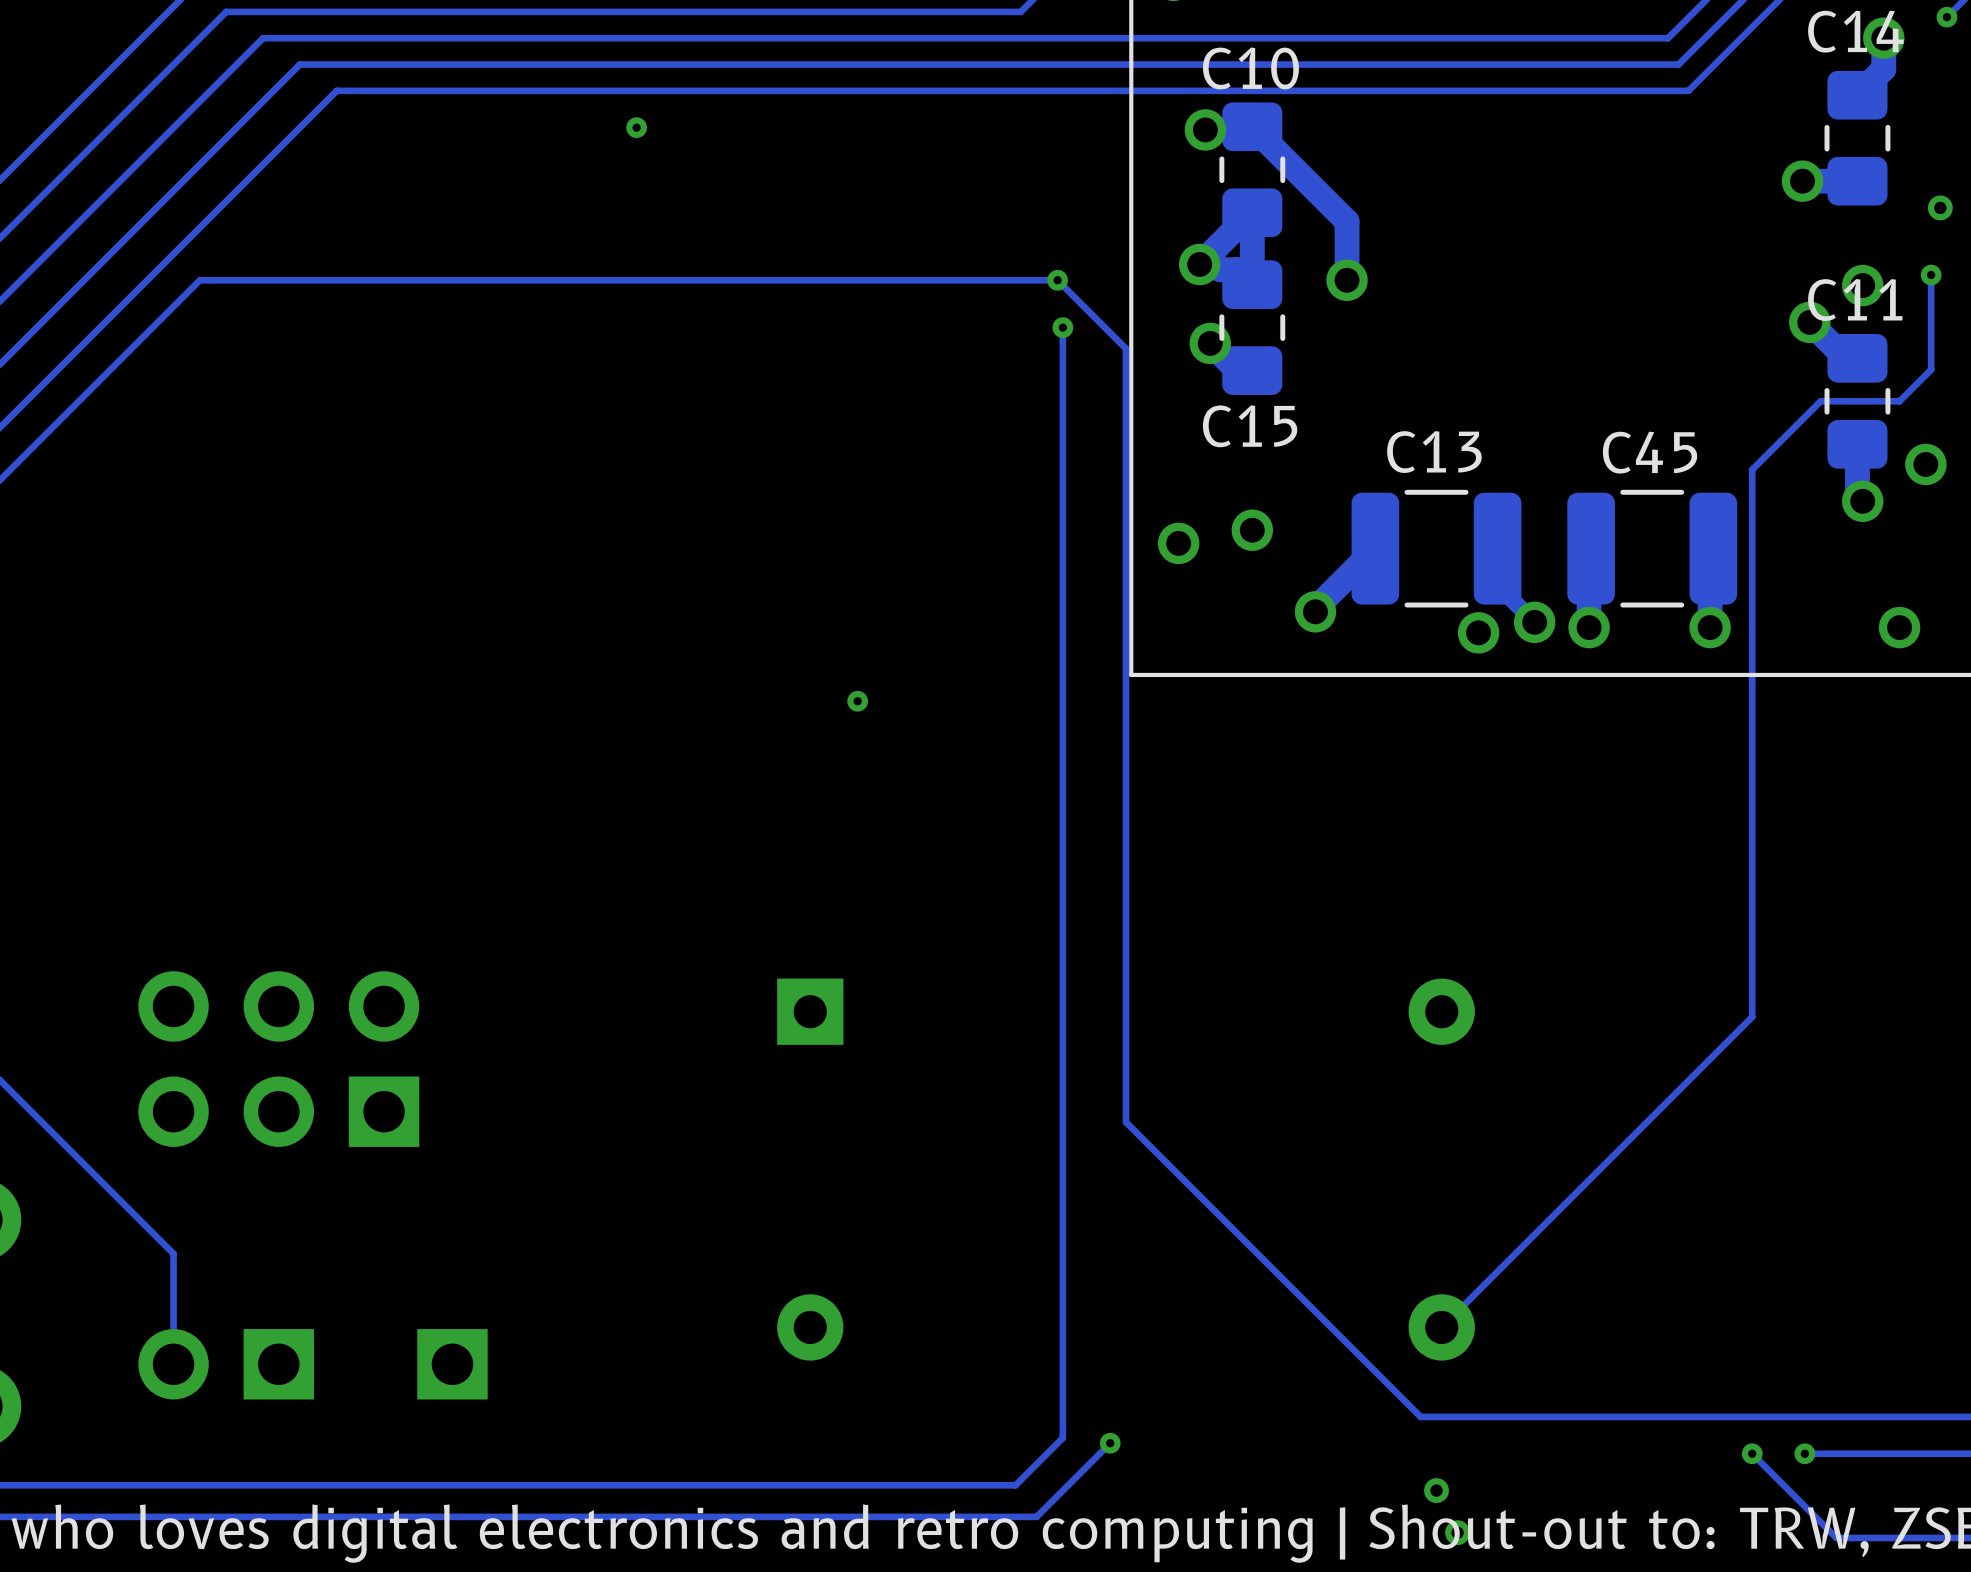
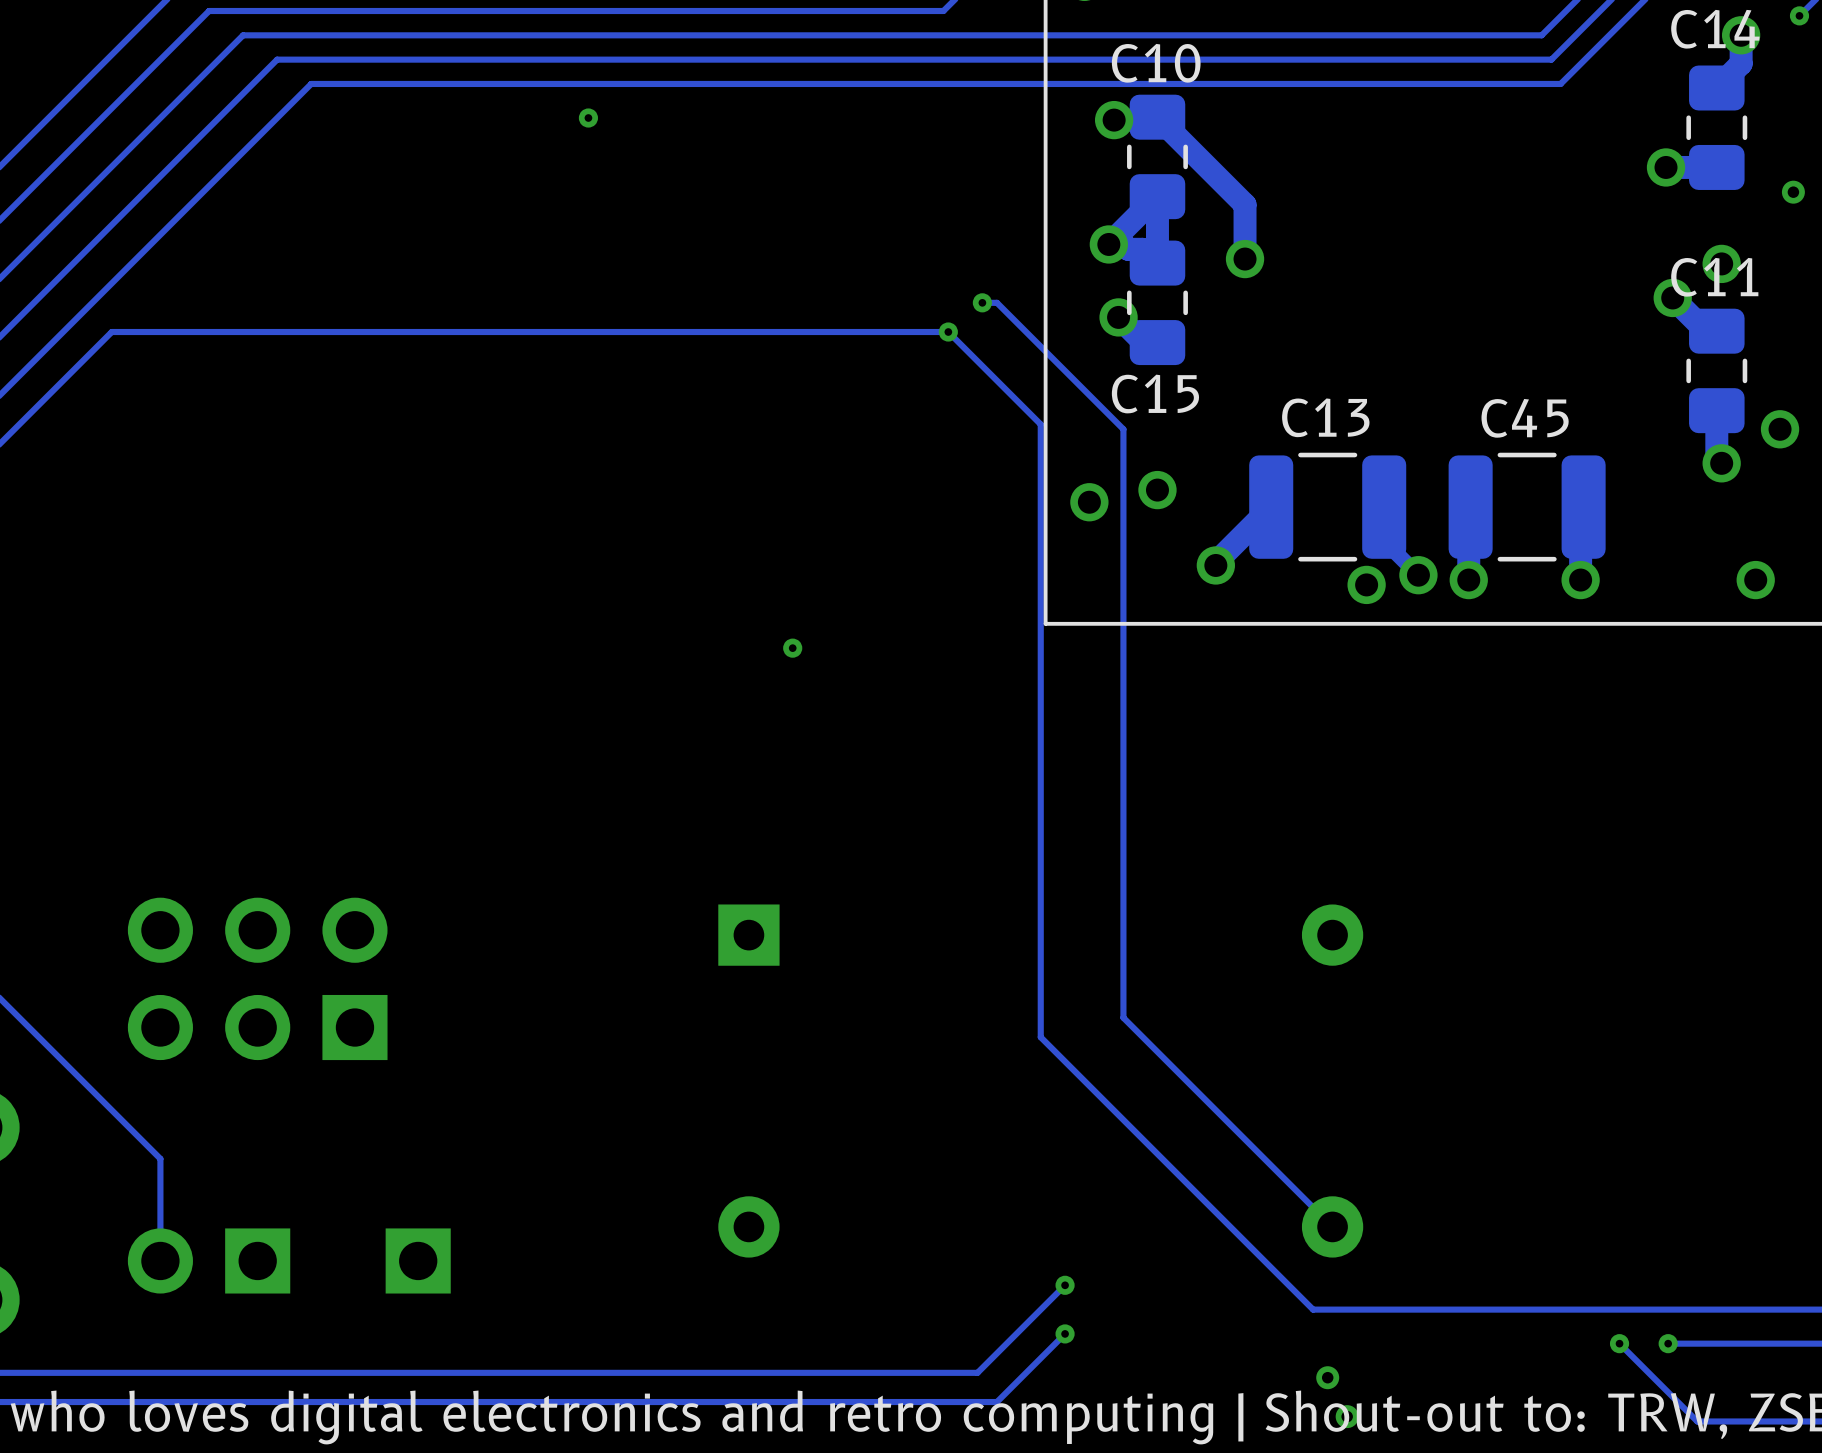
track: (1931, 275) (1931, 369) (1899, 401) (1820, 401) (1752, 469) (1752, 1016) (1441, 1327) -> (987, 302) (996, 302) (1123, 429) (1123, 1017) (1332, 1226)
via: (1931, 275) -> none
via position: (1057, 280) -> (948, 332)
track: (1062, 327) (1062, 1437) (1015, 1485) -> (1065, 1285) (977, 1372) (938, 1372)
track: (120, 359) (199, 280) (1057, 280) (1126, 348) (1126, 459) -> (111, 332) (948, 332) (1040, 424)
via: none -> (1065, 1285)
track: (1110, 1443) (1036, 1516) -> (1065, 1333) (996, 1402) (958, 1402)
via: (1110, 1443) -> none
via: none -> (1065, 1333)

